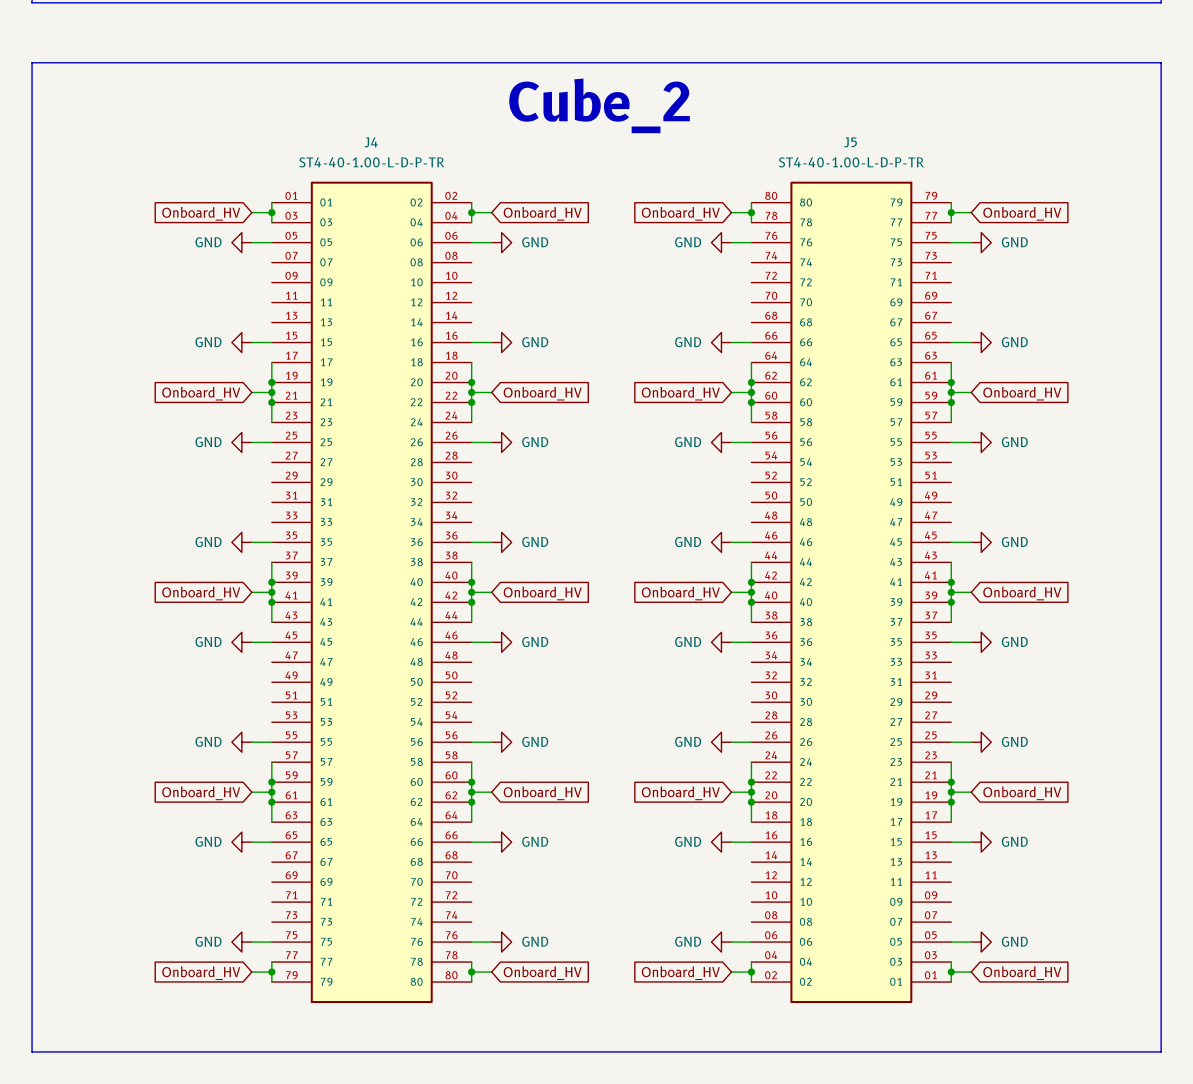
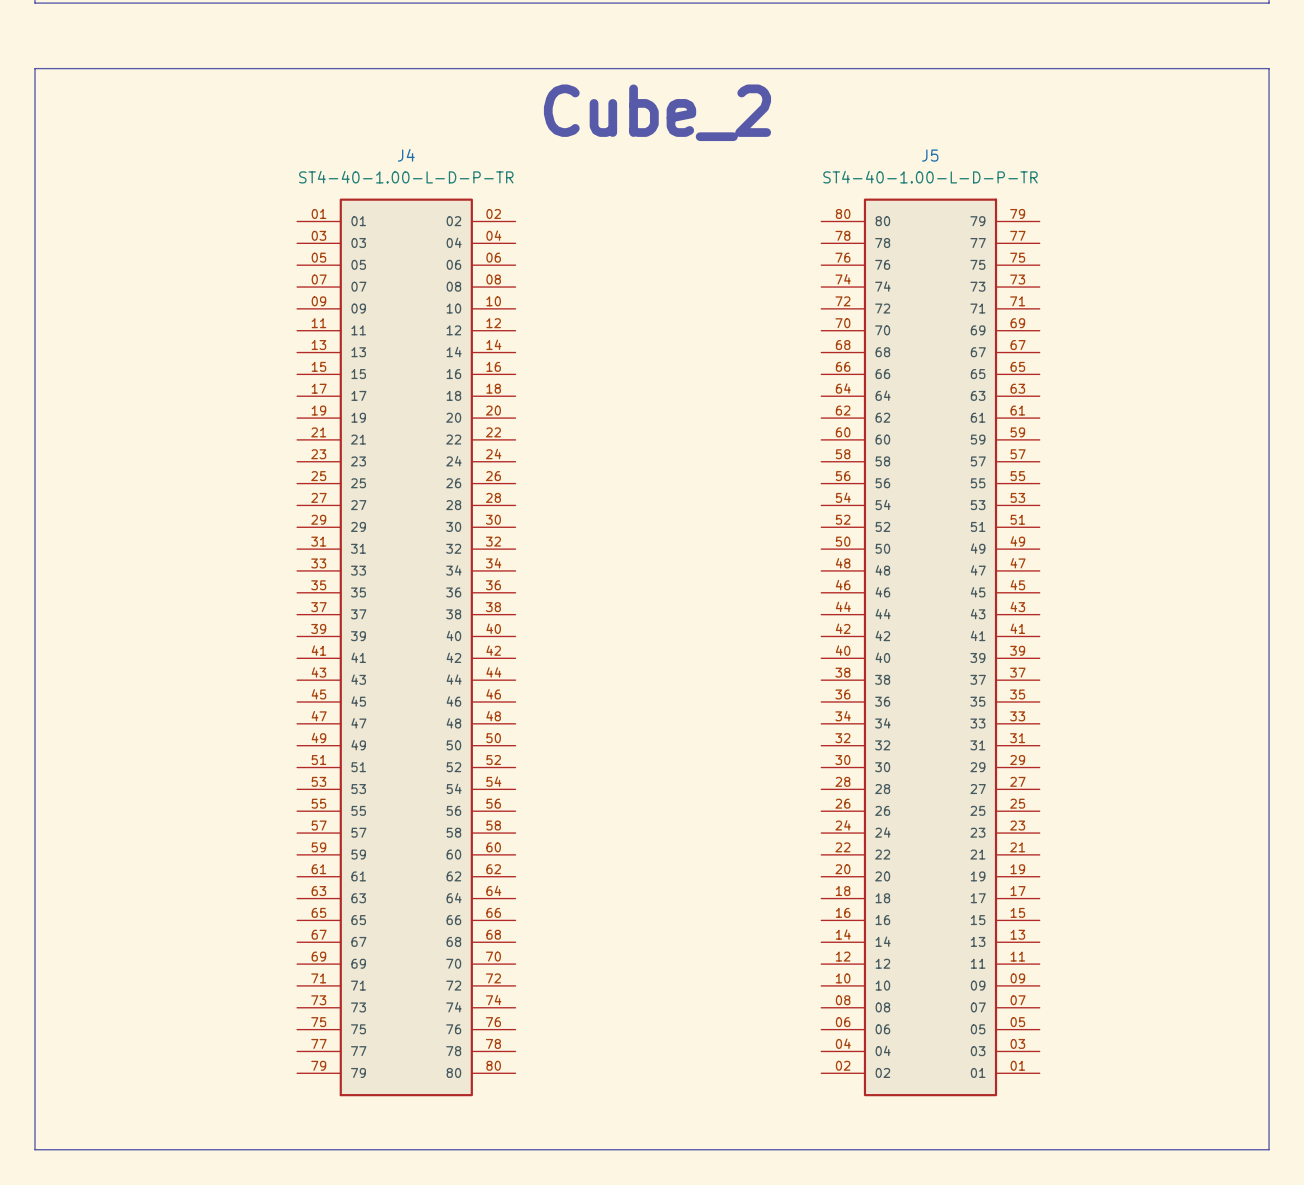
wire: (271, 202) (271, 222) -> none
wire: (471, 202) (471, 222) -> none
wire: (751, 202) (751, 222) -> none
wire: (951, 202) (951, 222) -> none
wire: (251, 212) (271, 212) -> none
junction: (271, 212) -> none
wire: (471, 212) (491, 212) -> none
junction: (471, 212) -> none
wire: (731, 212) (751, 212) -> none
junction: (751, 212) -> none
wire: (951, 212) (971, 212) -> none
junction: (951, 212) -> none
global label: Onboard_HV (201, 213) -> none
global label: Onboard_HV (542, 213) -> none
global label: Onboard_HV (680, 213) -> none
global label: Onboard_HV (1022, 213) -> none
power symbol: GND (241, 242) -> none
wire: (251, 242) (271, 242) -> none
wire: (471, 242) (491, 242) -> none
power symbol: GND (501, 242) -> none
power symbol: GND (721, 242) -> none
wire: (731, 242) (751, 242) -> none
wire: (951, 242) (971, 242) -> none
power symbol: GND (981, 242) -> none
power symbol: GND (241, 342) -> none
wire: (251, 342) (271, 342) -> none
wire: (471, 342) (491, 342) -> none
power symbol: GND (501, 342) -> none
power symbol: GND (721, 342) -> none
wire: (731, 342) (751, 342) -> none
wire: (951, 342) (971, 342) -> none
power symbol: GND (981, 342) -> none
wire: (271, 362) (271, 422) -> none
wire: (471, 362) (471, 422) -> none
wire: (751, 362) (751, 422) -> none
wire: (951, 362) (951, 422) -> none
junction: (271, 382) -> none
junction: (471, 382) -> none
junction: (751, 382) -> none
junction: (951, 382) -> none
wire: (251, 392) (271, 392) -> none
junction: (271, 392) -> none
wire: (471, 392) (491, 392) -> none
junction: (471, 392) -> none
wire: (731, 392) (751, 392) -> none
junction: (751, 392) -> none
wire: (951, 392) (971, 392) -> none
junction: (951, 392) -> none
global label: Onboard_HV (201, 393) -> none
global label: Onboard_HV (542, 393) -> none
global label: Onboard_HV (680, 393) -> none
global label: Onboard_HV (1022, 393) -> none
junction: (271, 402) -> none
junction: (471, 402) -> none
junction: (751, 402) -> none
junction: (951, 402) -> none
power symbol: GND (241, 442) -> none
wire: (251, 442) (271, 442) -> none
wire: (471, 442) (491, 442) -> none
power symbol: GND (501, 442) -> none
power symbol: GND (721, 442) -> none
wire: (731, 442) (751, 442) -> none
wire: (951, 442) (971, 442) -> none
power symbol: GND (981, 442) -> none
power symbol: GND (241, 542) -> none
wire: (251, 542) (271, 542) -> none
wire: (471, 542) (491, 542) -> none
power symbol: GND (501, 542) -> none
power symbol: GND (721, 542) -> none
wire: (731, 542) (751, 542) -> none
wire: (951, 542) (971, 542) -> none
power symbol: GND (981, 542) -> none
wire: (271, 562) (271, 622) -> none
wire: (471, 562) (471, 622) -> none
wire: (751, 562) (751, 622) -> none
wire: (951, 562) (951, 622) -> none
junction: (271, 582) -> none
junction: (471, 582) -> none
junction: (751, 582) -> none
junction: (951, 582) -> none
wire: (251, 592) (271, 592) -> none
junction: (271, 592) -> none
wire: (471, 592) (491, 592) -> none
junction: (471, 592) -> none
wire: (731, 592) (751, 592) -> none
junction: (751, 592) -> none
wire: (951, 592) (971, 592) -> none
junction: (951, 592) -> none
global label: Onboard_HV (201, 593) -> none
global label: Onboard_HV (542, 593) -> none
global label: Onboard_HV (680, 593) -> none
global label: Onboard_HV (1022, 593) -> none
junction: (271, 602) -> none
junction: (471, 602) -> none
junction: (751, 602) -> none
junction: (951, 602) -> none
power symbol: GND (241, 642) -> none
wire: (251, 642) (271, 642) -> none
wire: (471, 642) (491, 642) -> none
power symbol: GND (501, 642) -> none
power symbol: GND (721, 642) -> none
wire: (731, 642) (751, 642) -> none
wire: (951, 642) (971, 642) -> none
power symbol: GND (981, 642) -> none
power symbol: GND (241, 742) -> none
wire: (251, 742) (271, 742) -> none
wire: (471, 742) (491, 742) -> none
power symbol: GND (501, 742) -> none
power symbol: GND (721, 742) -> none
wire: (731, 742) (751, 742) -> none
wire: (951, 742) (971, 742) -> none
power symbol: GND (981, 742) -> none
wire: (271, 762) (271, 822) -> none
wire: (471, 762) (471, 822) -> none
wire: (751, 762) (751, 822) -> none
wire: (951, 762) (951, 822) -> none
junction: (271, 782) -> none
junction: (471, 782) -> none
junction: (751, 782) -> none
junction: (951, 782) -> none
wire: (251, 792) (271, 792) -> none
junction: (271, 792) -> none
wire: (471, 792) (491, 792) -> none
junction: (471, 792) -> none
wire: (731, 792) (751, 792) -> none
junction: (751, 792) -> none
wire: (951, 792) (971, 792) -> none
junction: (951, 792) -> none
global label: Onboard_HV (201, 793) -> none
global label: Onboard_HV (542, 793) -> none
global label: Onboard_HV (680, 793) -> none
global label: Onboard_HV (1022, 793) -> none
junction: (271, 802) -> none
junction: (471, 802) -> none
junction: (751, 802) -> none
junction: (951, 802) -> none
power symbol: GND (241, 842) -> none
wire: (251, 842) (271, 842) -> none
wire: (471, 842) (491, 842) -> none
power symbol: GND (501, 842) -> none
power symbol: GND (721, 842) -> none
wire: (731, 842) (751, 842) -> none
wire: (951, 842) (971, 842) -> none
power symbol: GND (981, 842) -> none
power symbol: GND (241, 942) -> none
wire: (251, 942) (271, 942) -> none
wire: (471, 942) (491, 942) -> none
power symbol: GND (501, 942) -> none
power symbol: GND (721, 942) -> none
wire: (731, 942) (751, 942) -> none
wire: (951, 942) (971, 942) -> none
power symbol: GND (981, 942) -> none
wire: (271, 962) (271, 982) -> none
wire: (471, 962) (471, 982) -> none
wire: (751, 962) (751, 982) -> none
wire: (951, 962) (951, 982) -> none
wire: (251, 972) (271, 972) -> none
junction: (271, 972) -> none
wire: (471, 972) (491, 972) -> none
junction: (471, 972) -> none
wire: (731, 972) (751, 972) -> none
junction: (751, 972) -> none
wire: (951, 972) (971, 972) -> none
junction: (951, 972) -> none
global label: Onboard_HV (201, 973) -> none
global label: Onboard_HV (542, 973) -> none
global label: Onboard_HV (680, 973) -> none
global label: Onboard_HV (1022, 973) -> none

